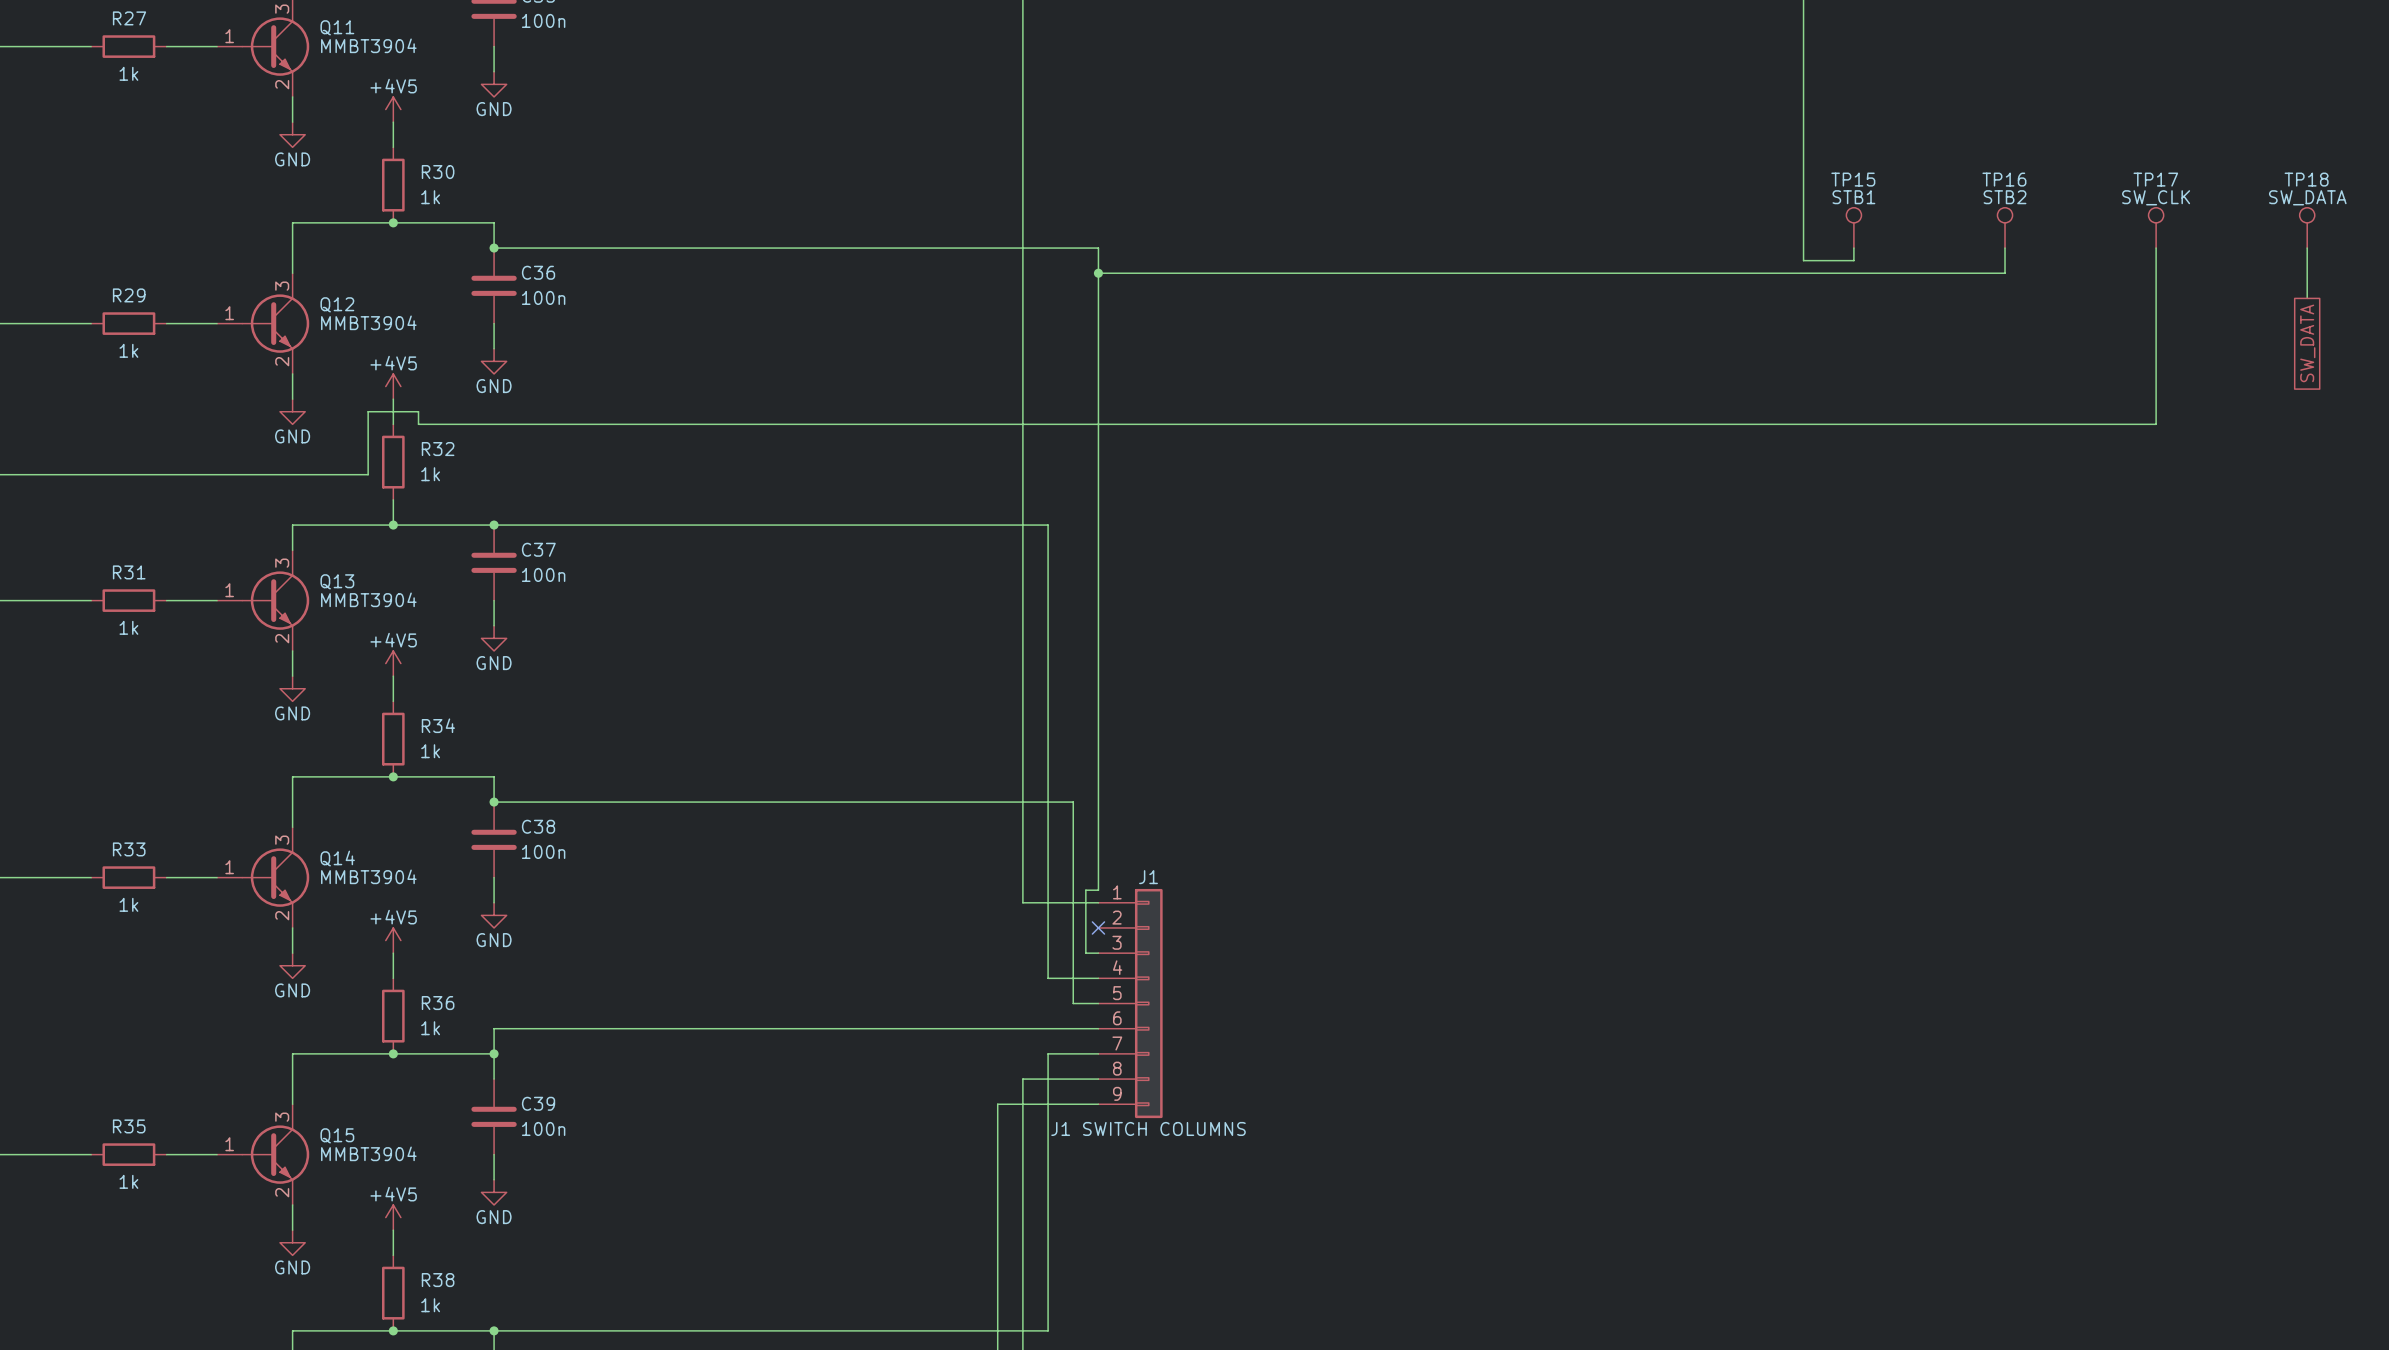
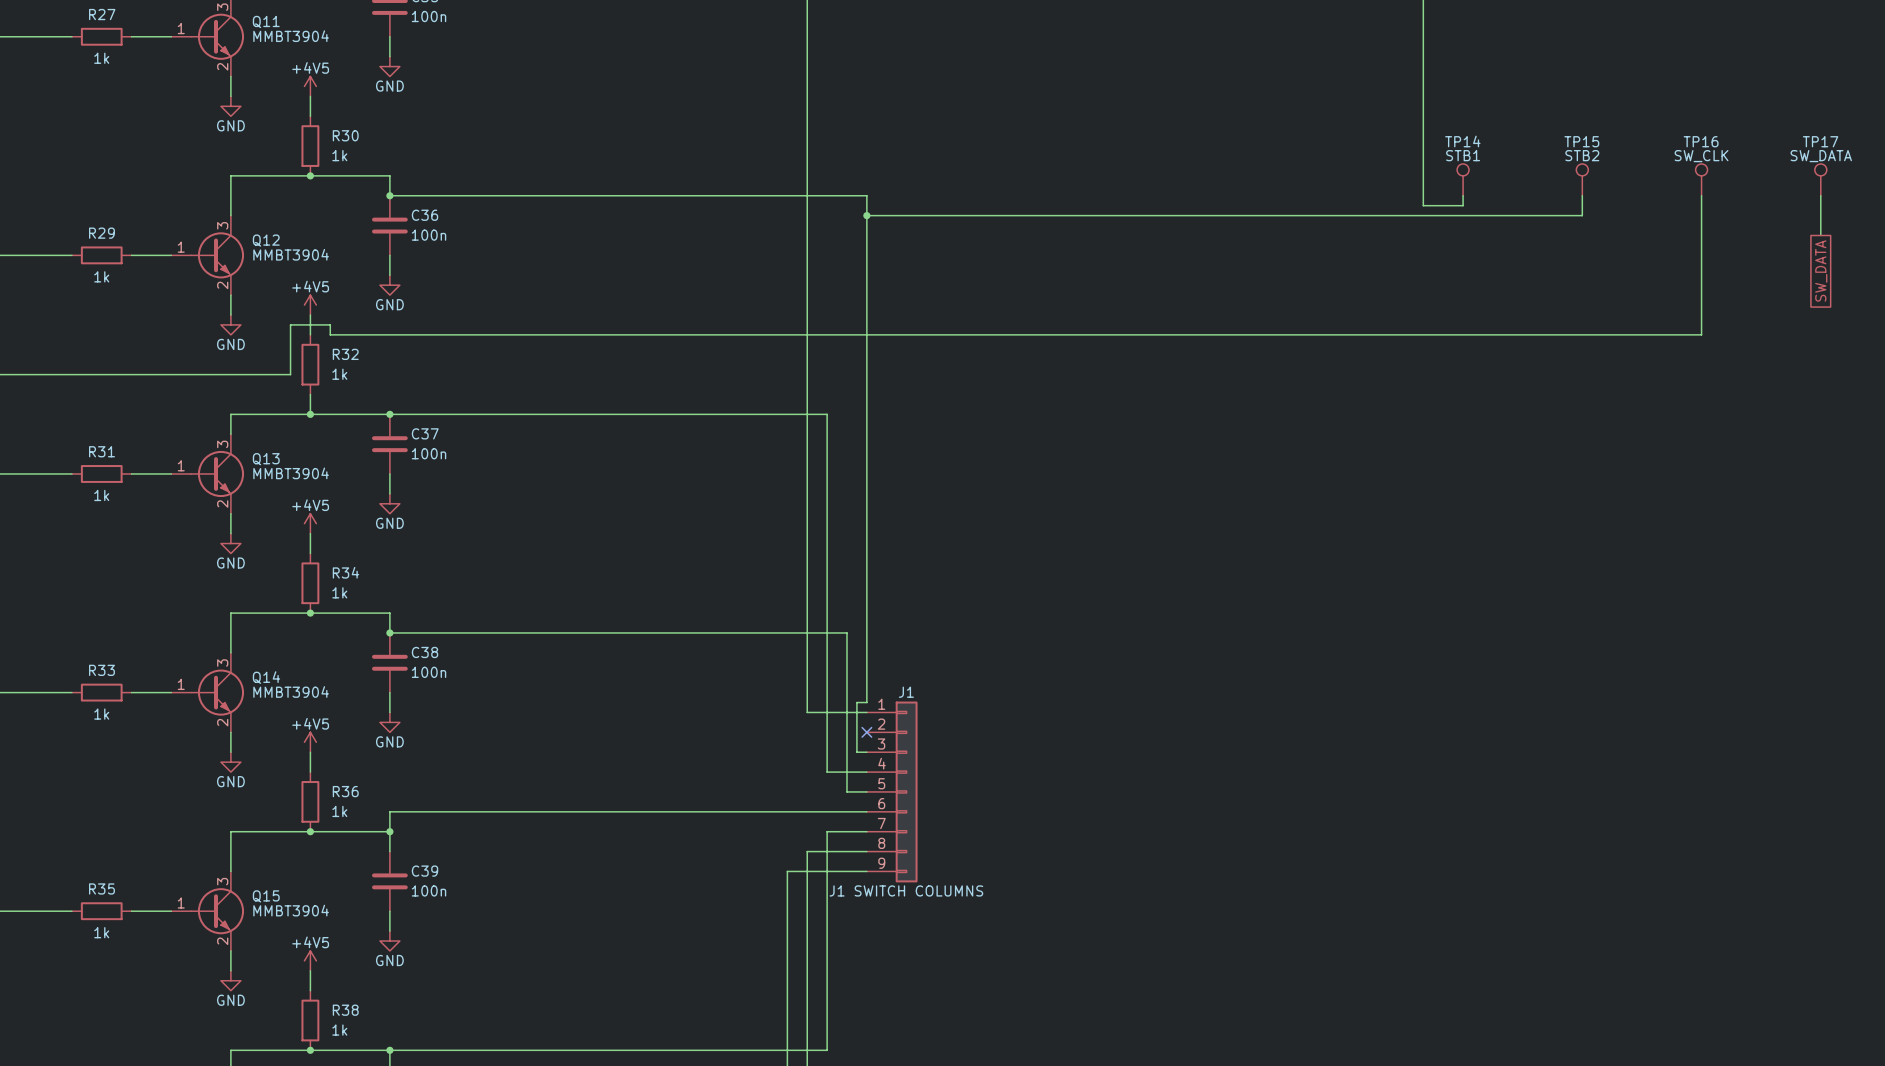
TP15 name: TP15 (1853, 179) -> TP14 (1462, 141)
TP16 name: TP16 (2004, 179) -> TP15 (1581, 141)
TP17 name: TP17 (2155, 179) -> TP16 (1701, 141)
TP18 name: TP18 (2306, 179) -> TP17 (1820, 141)

